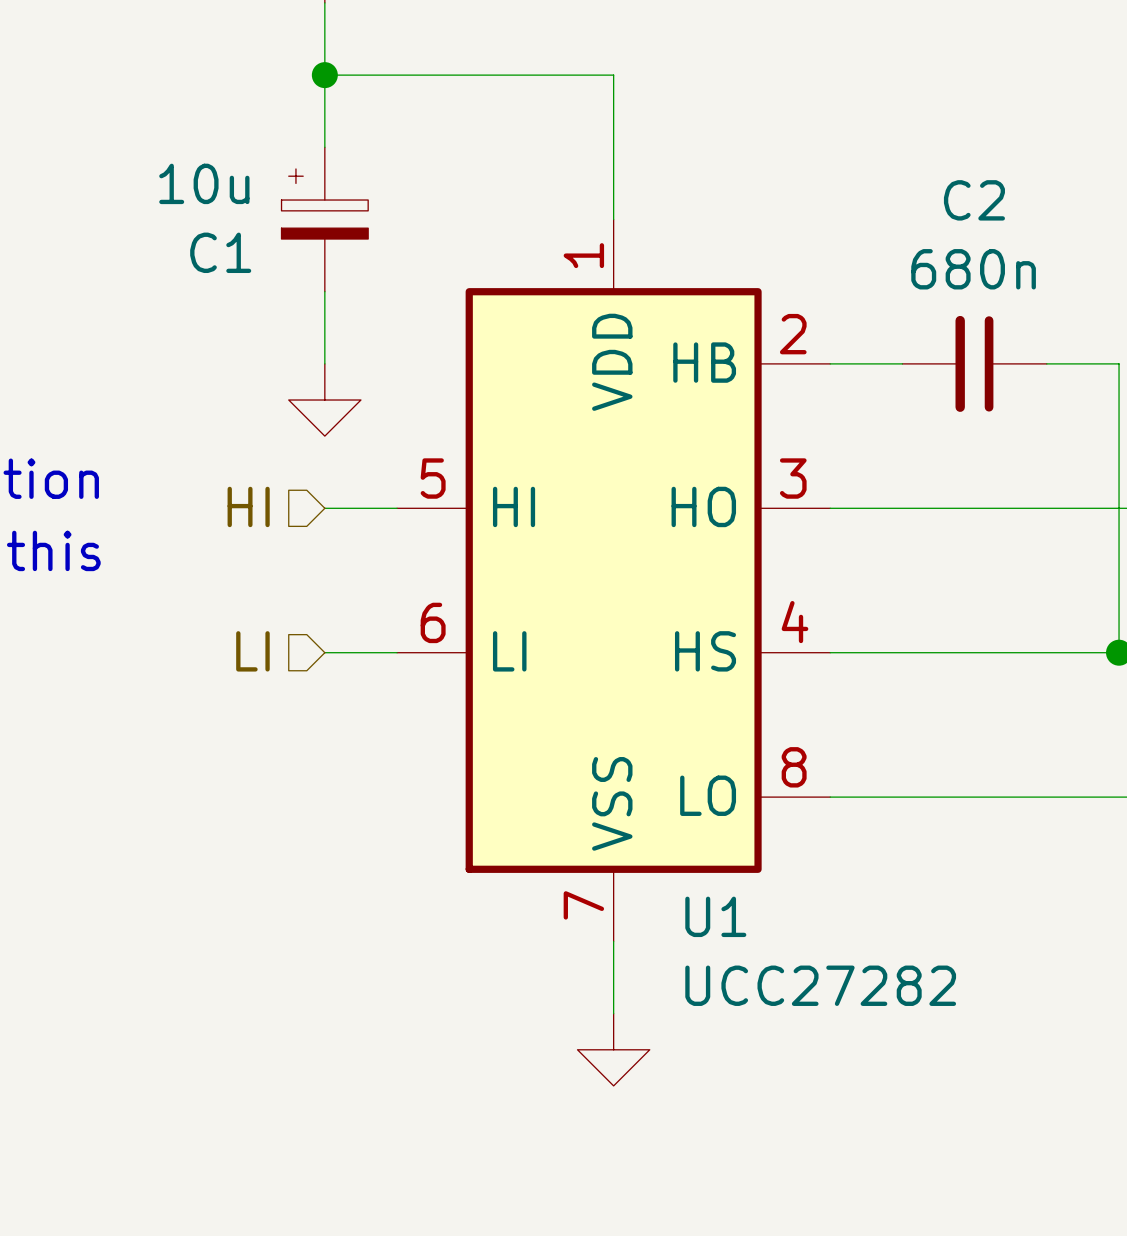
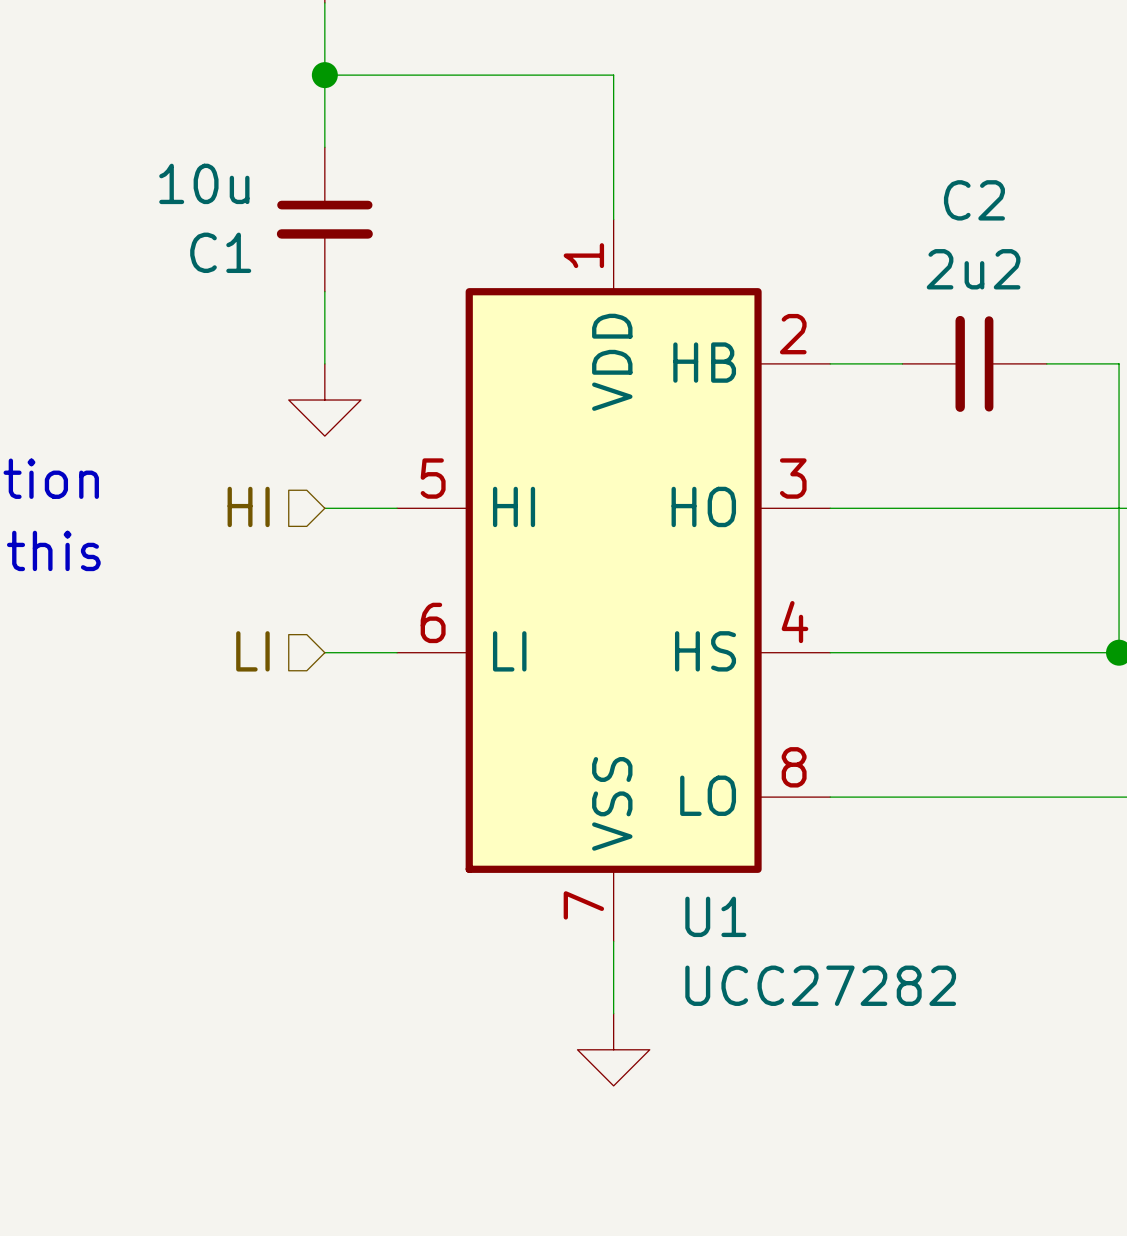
C1 symbol: [281, 147, 369, 292] -> [276, 147, 373, 292]
C2 value: 680n (973, 269) -> 2u2 (973, 269)

